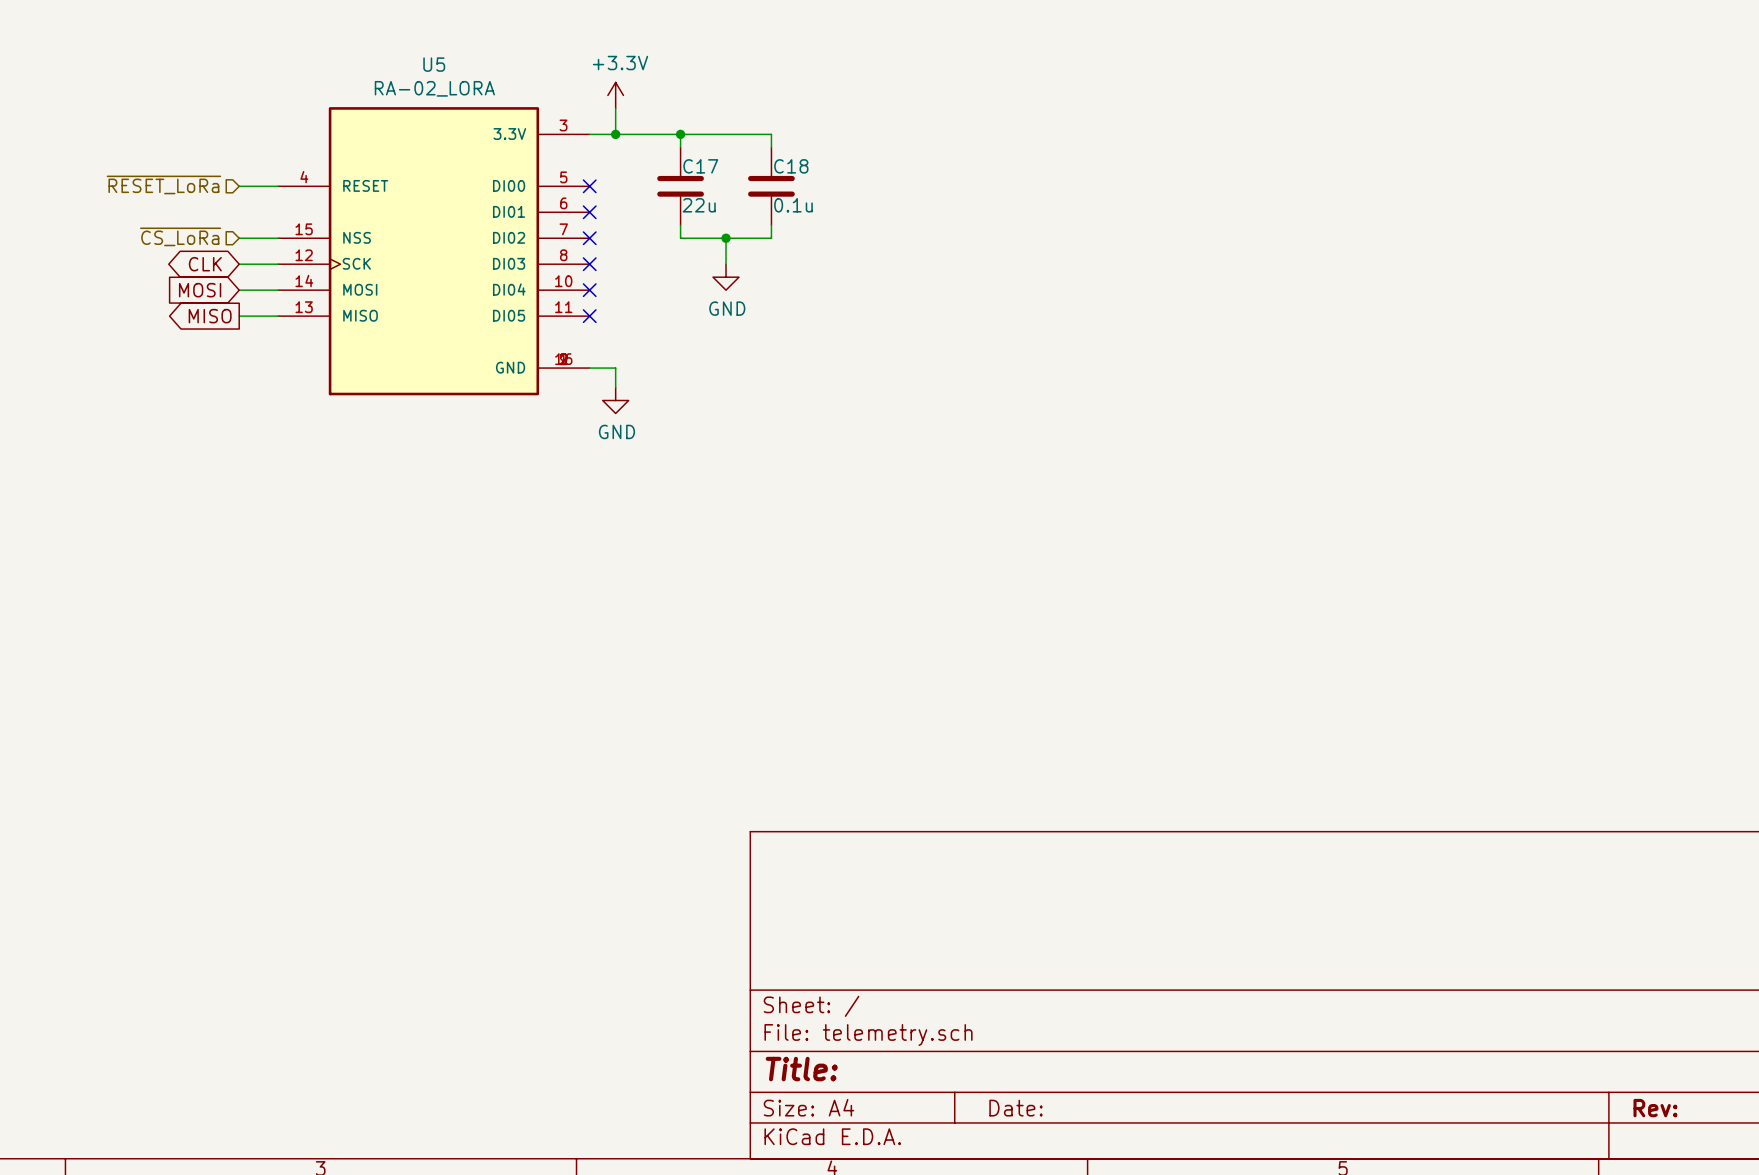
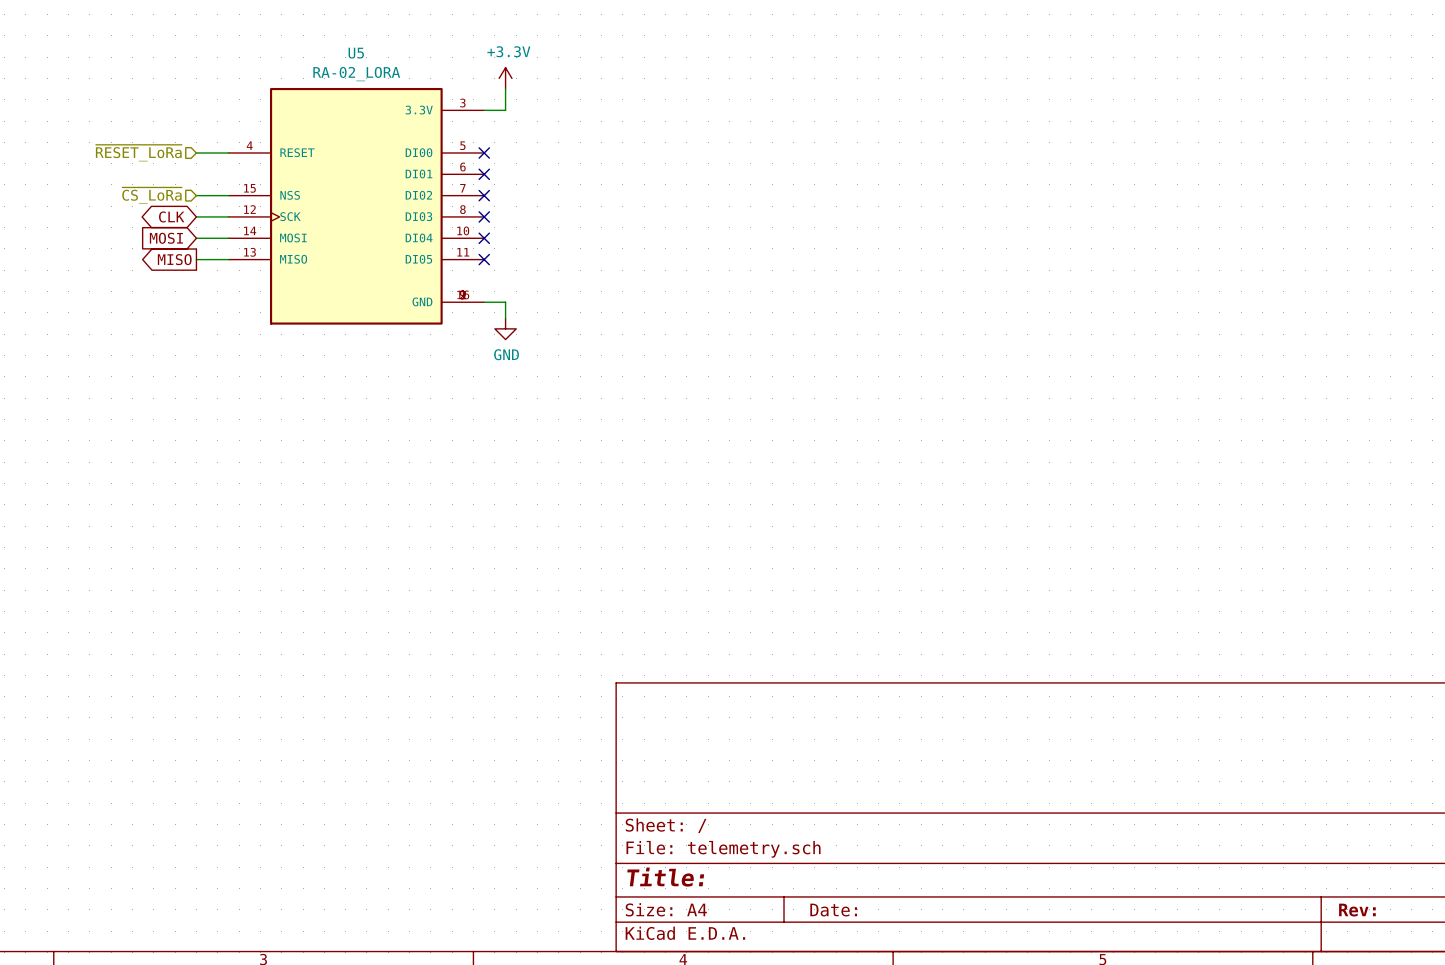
wire: (615, 134) (771, 134) (771, 147) -> none
junction: (615, 134) -> none
wire: (680, 134) (680, 147) -> none
junction: (680, 134) -> none
C17: 22u (680, 186) -> none
C18: 0.1u (771, 186) -> none
wire: (680, 225) (680, 238) (771, 238) (771, 225) -> none
wire: (726, 238) (726, 264) -> none
junction: (726, 238) -> none
power symbol: GND (726, 277) -> none

